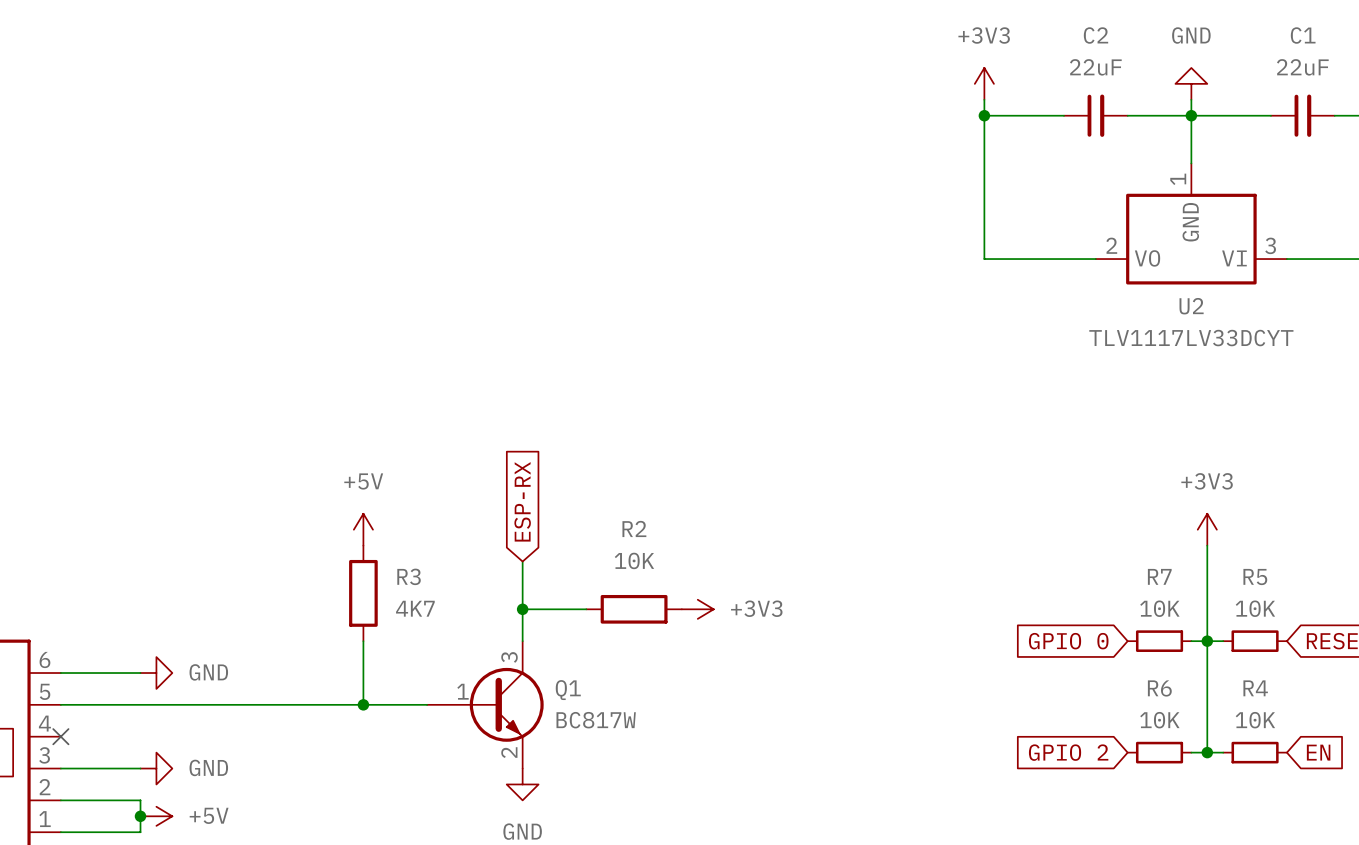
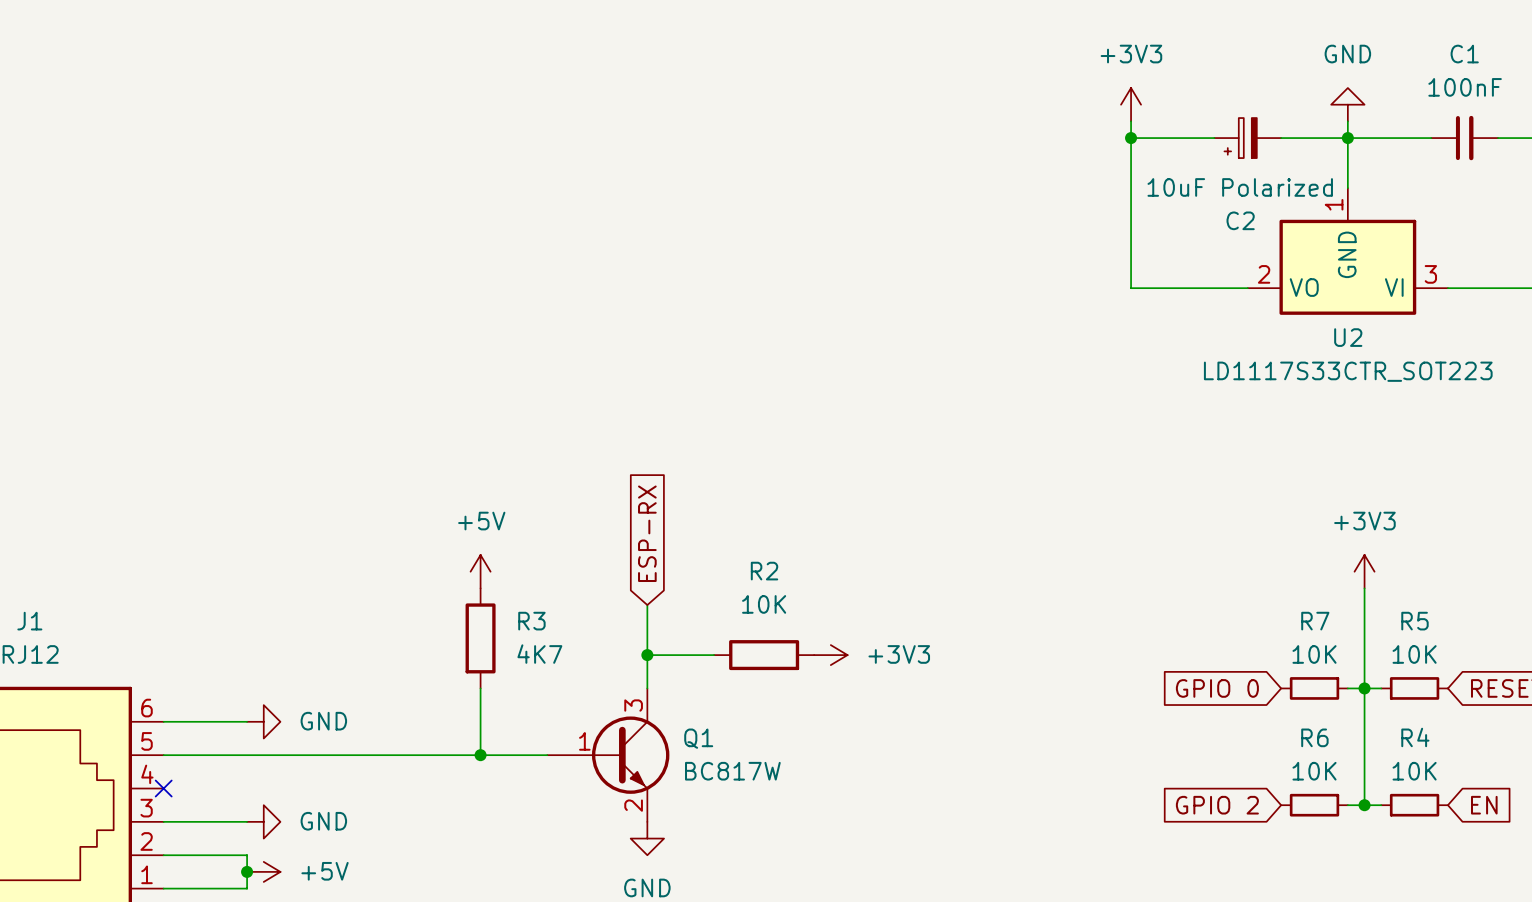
C2 name position: C2 (1096, 35) -> C2 (1240, 220)
C2 value: 22uF (1095, 67) -> 10uF Polarized (1240, 187)
C1 value: 22uF (1302, 67) -> 100nF (1465, 87)
C2 symbol: [1064, 94, 1128, 137] -> [1214, 118, 1282, 159]
U2 value: TLV1117LV33DCYT (1191, 338) -> LD1117S33CTR_SOT223 (1348, 371)

